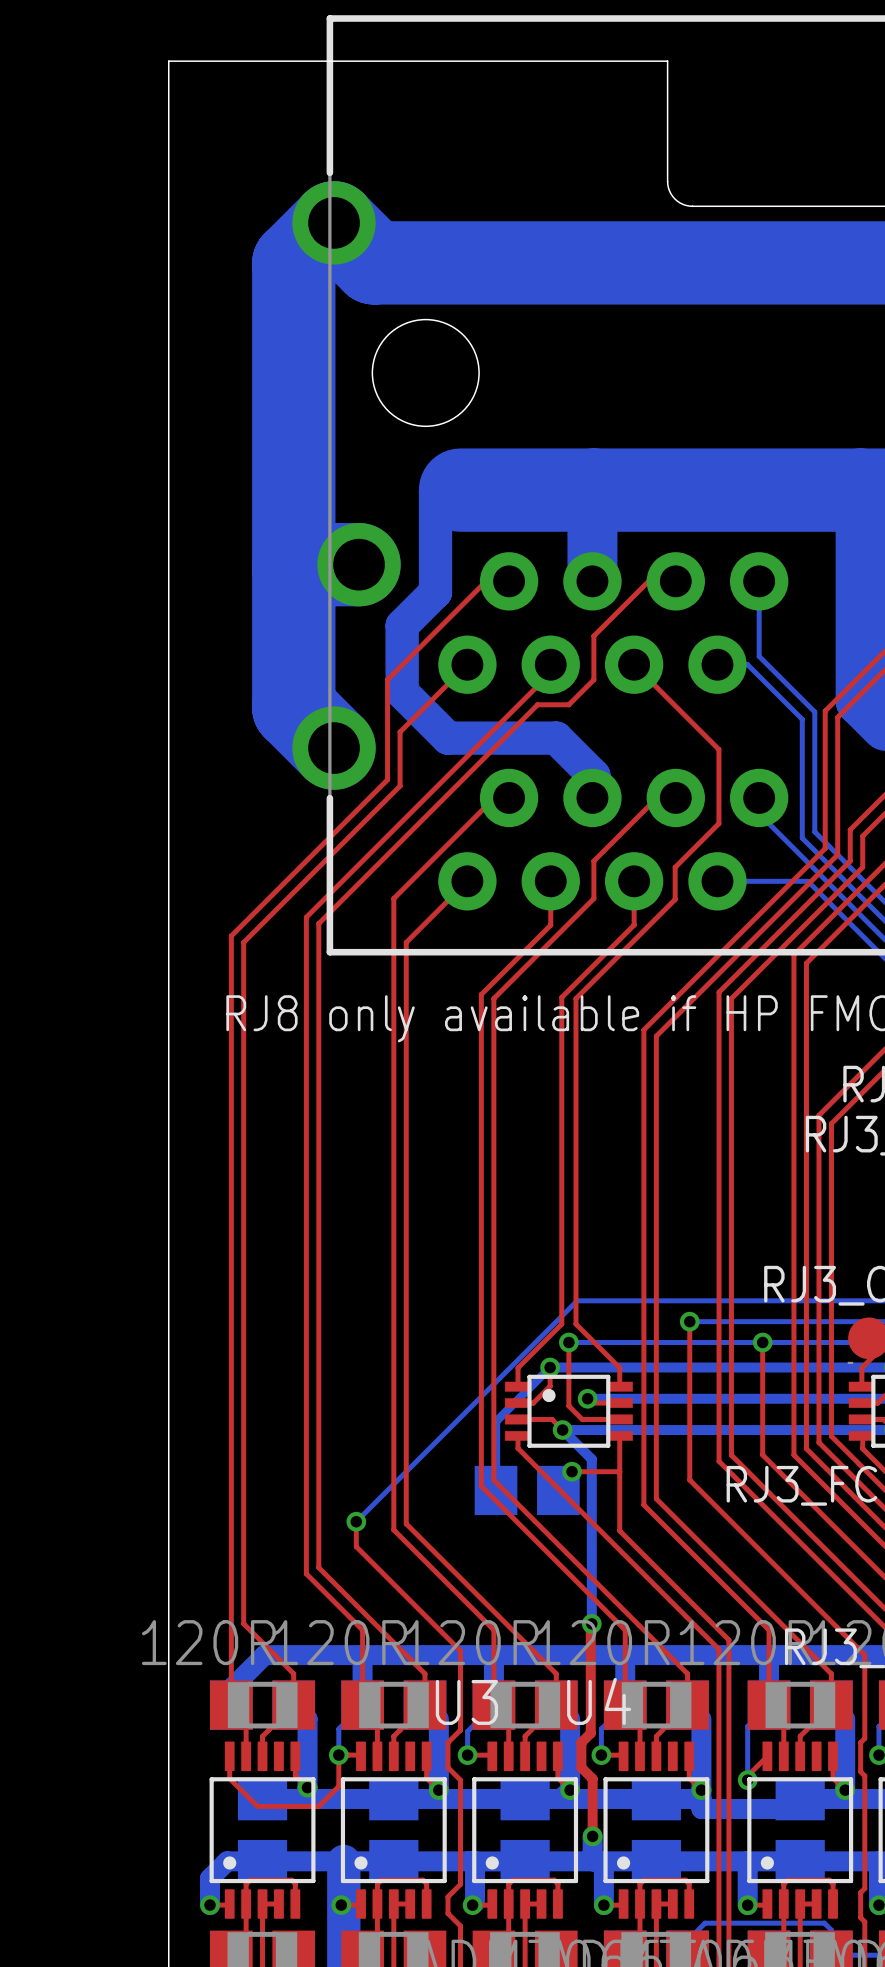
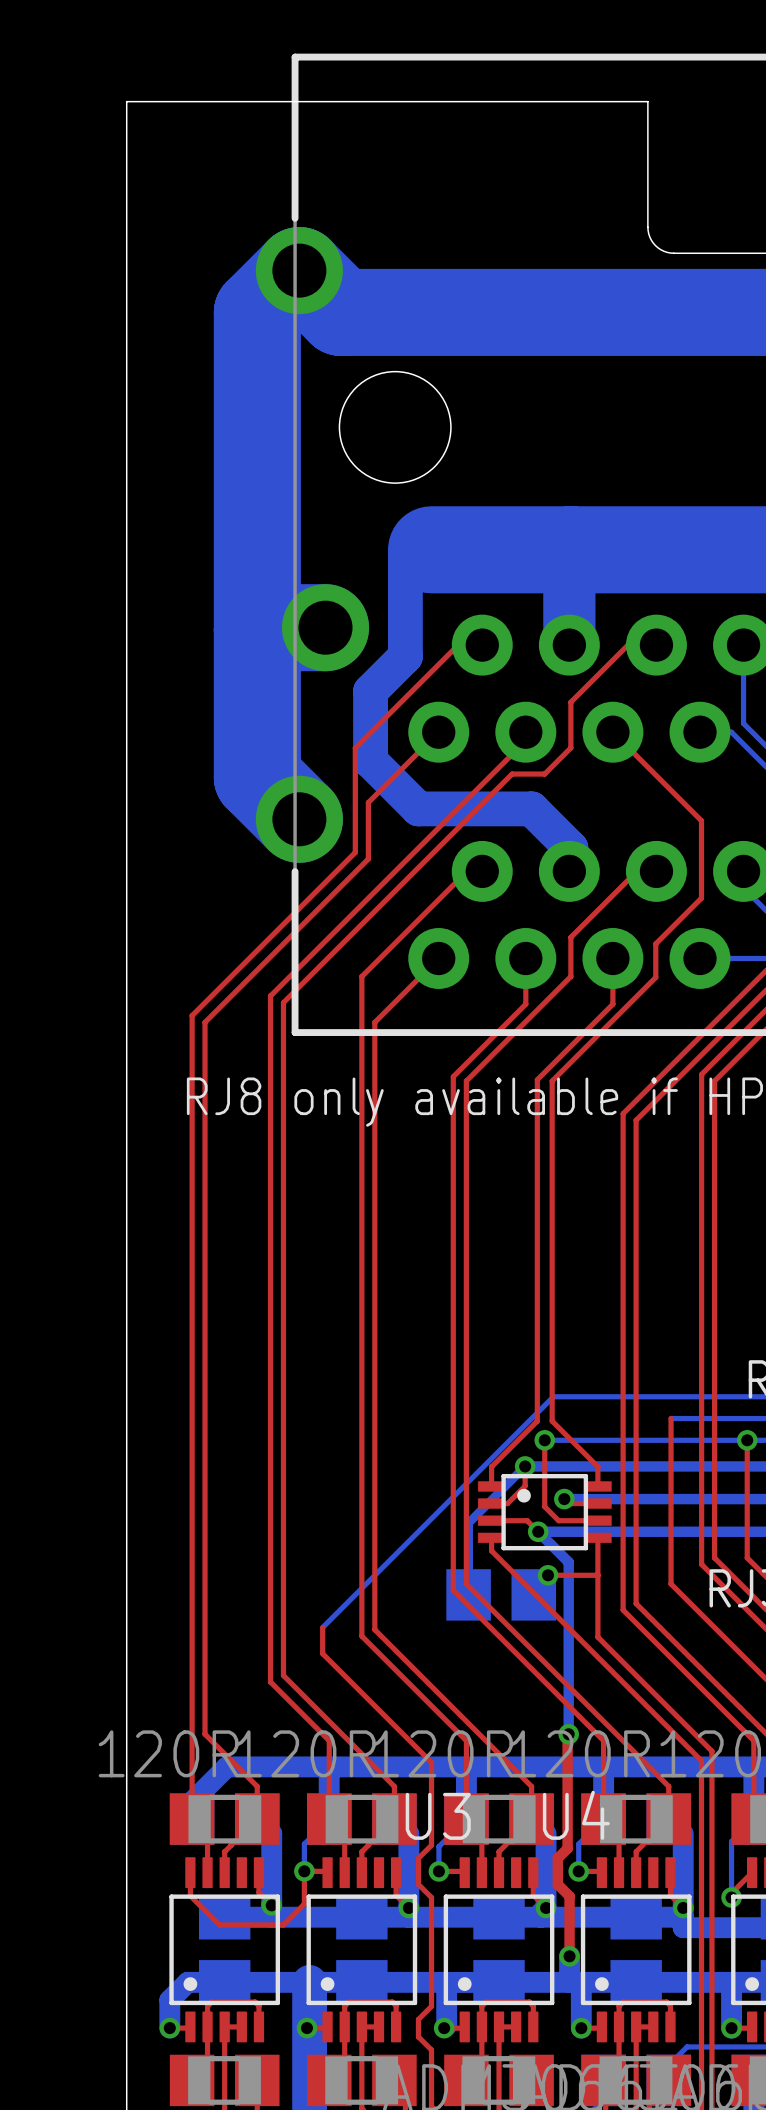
via: (689, 1321) -> none
via: (356, 1521) -> none

